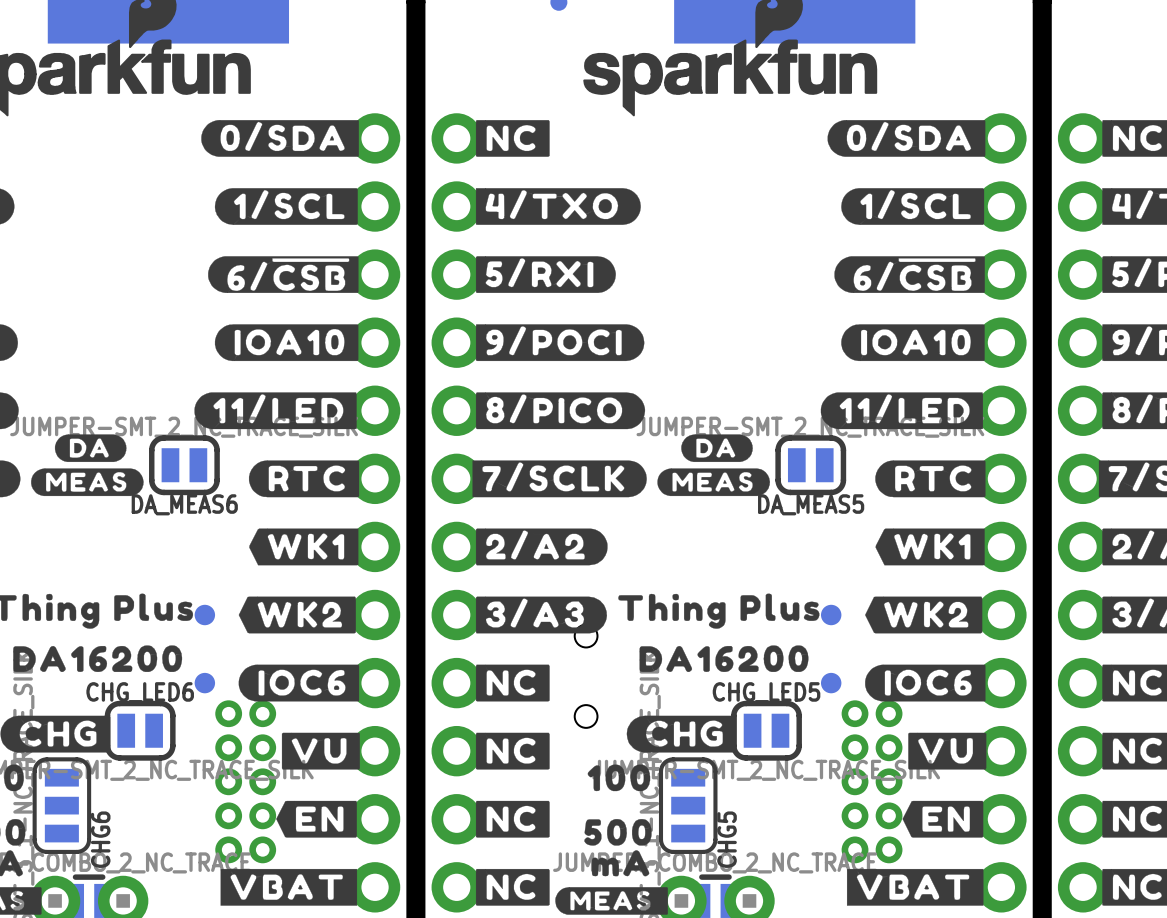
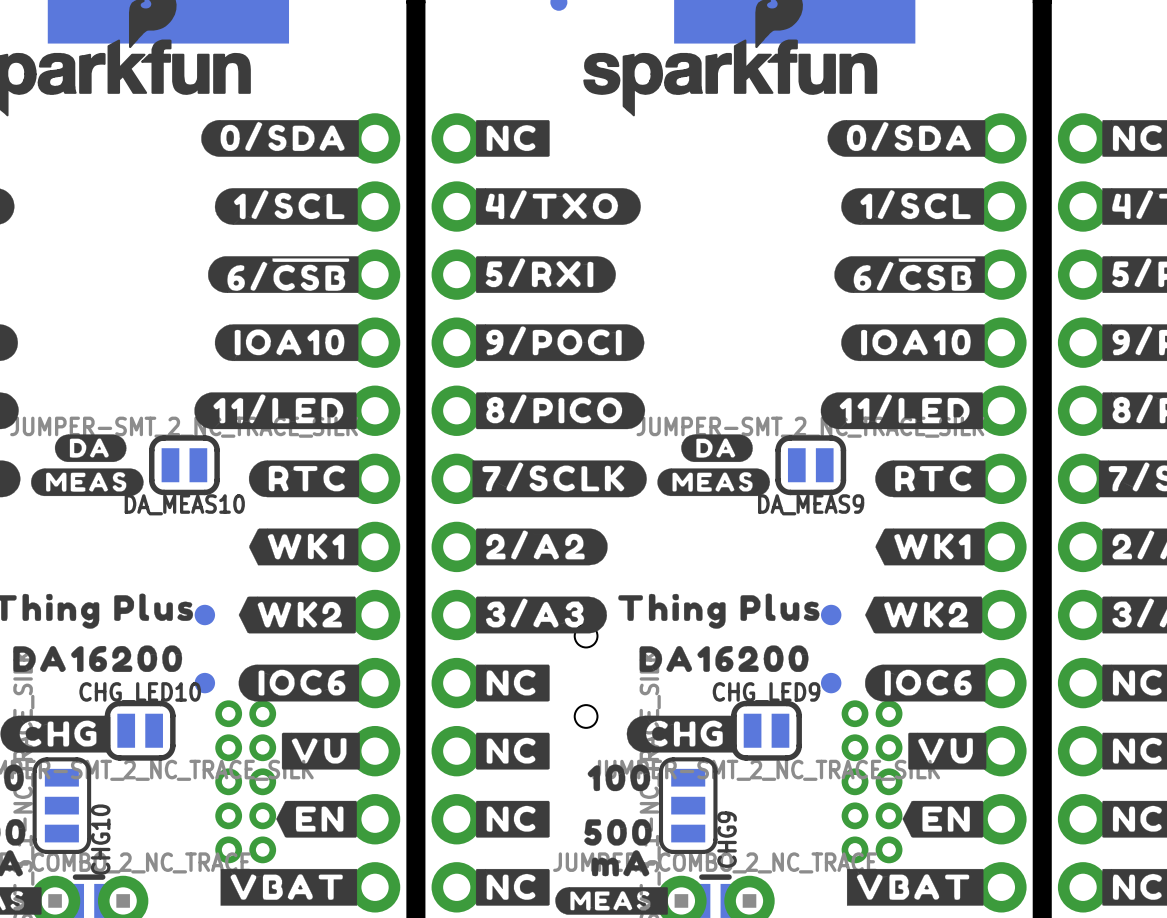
DA_MEAS6 name: DA_MEAS6 (184, 504) -> DA_MEAS10 (184, 504)
DA_MEAS5 name: DA_MEAS5 (811, 504) -> DA_MEAS9 (811, 504)
CHG_LED6 name: CHG_LED6 (140, 692) -> CHG_LED10 (140, 692)
CHG_LED5 name: CHG_LED5 (766, 692) -> CHG_LED9 (766, 692)
CHG6 name: CHG6 (100, 839) -> CHG10 (100, 839)
CHG5 name: CHG5 (727, 839) -> CHG9 (727, 839)

